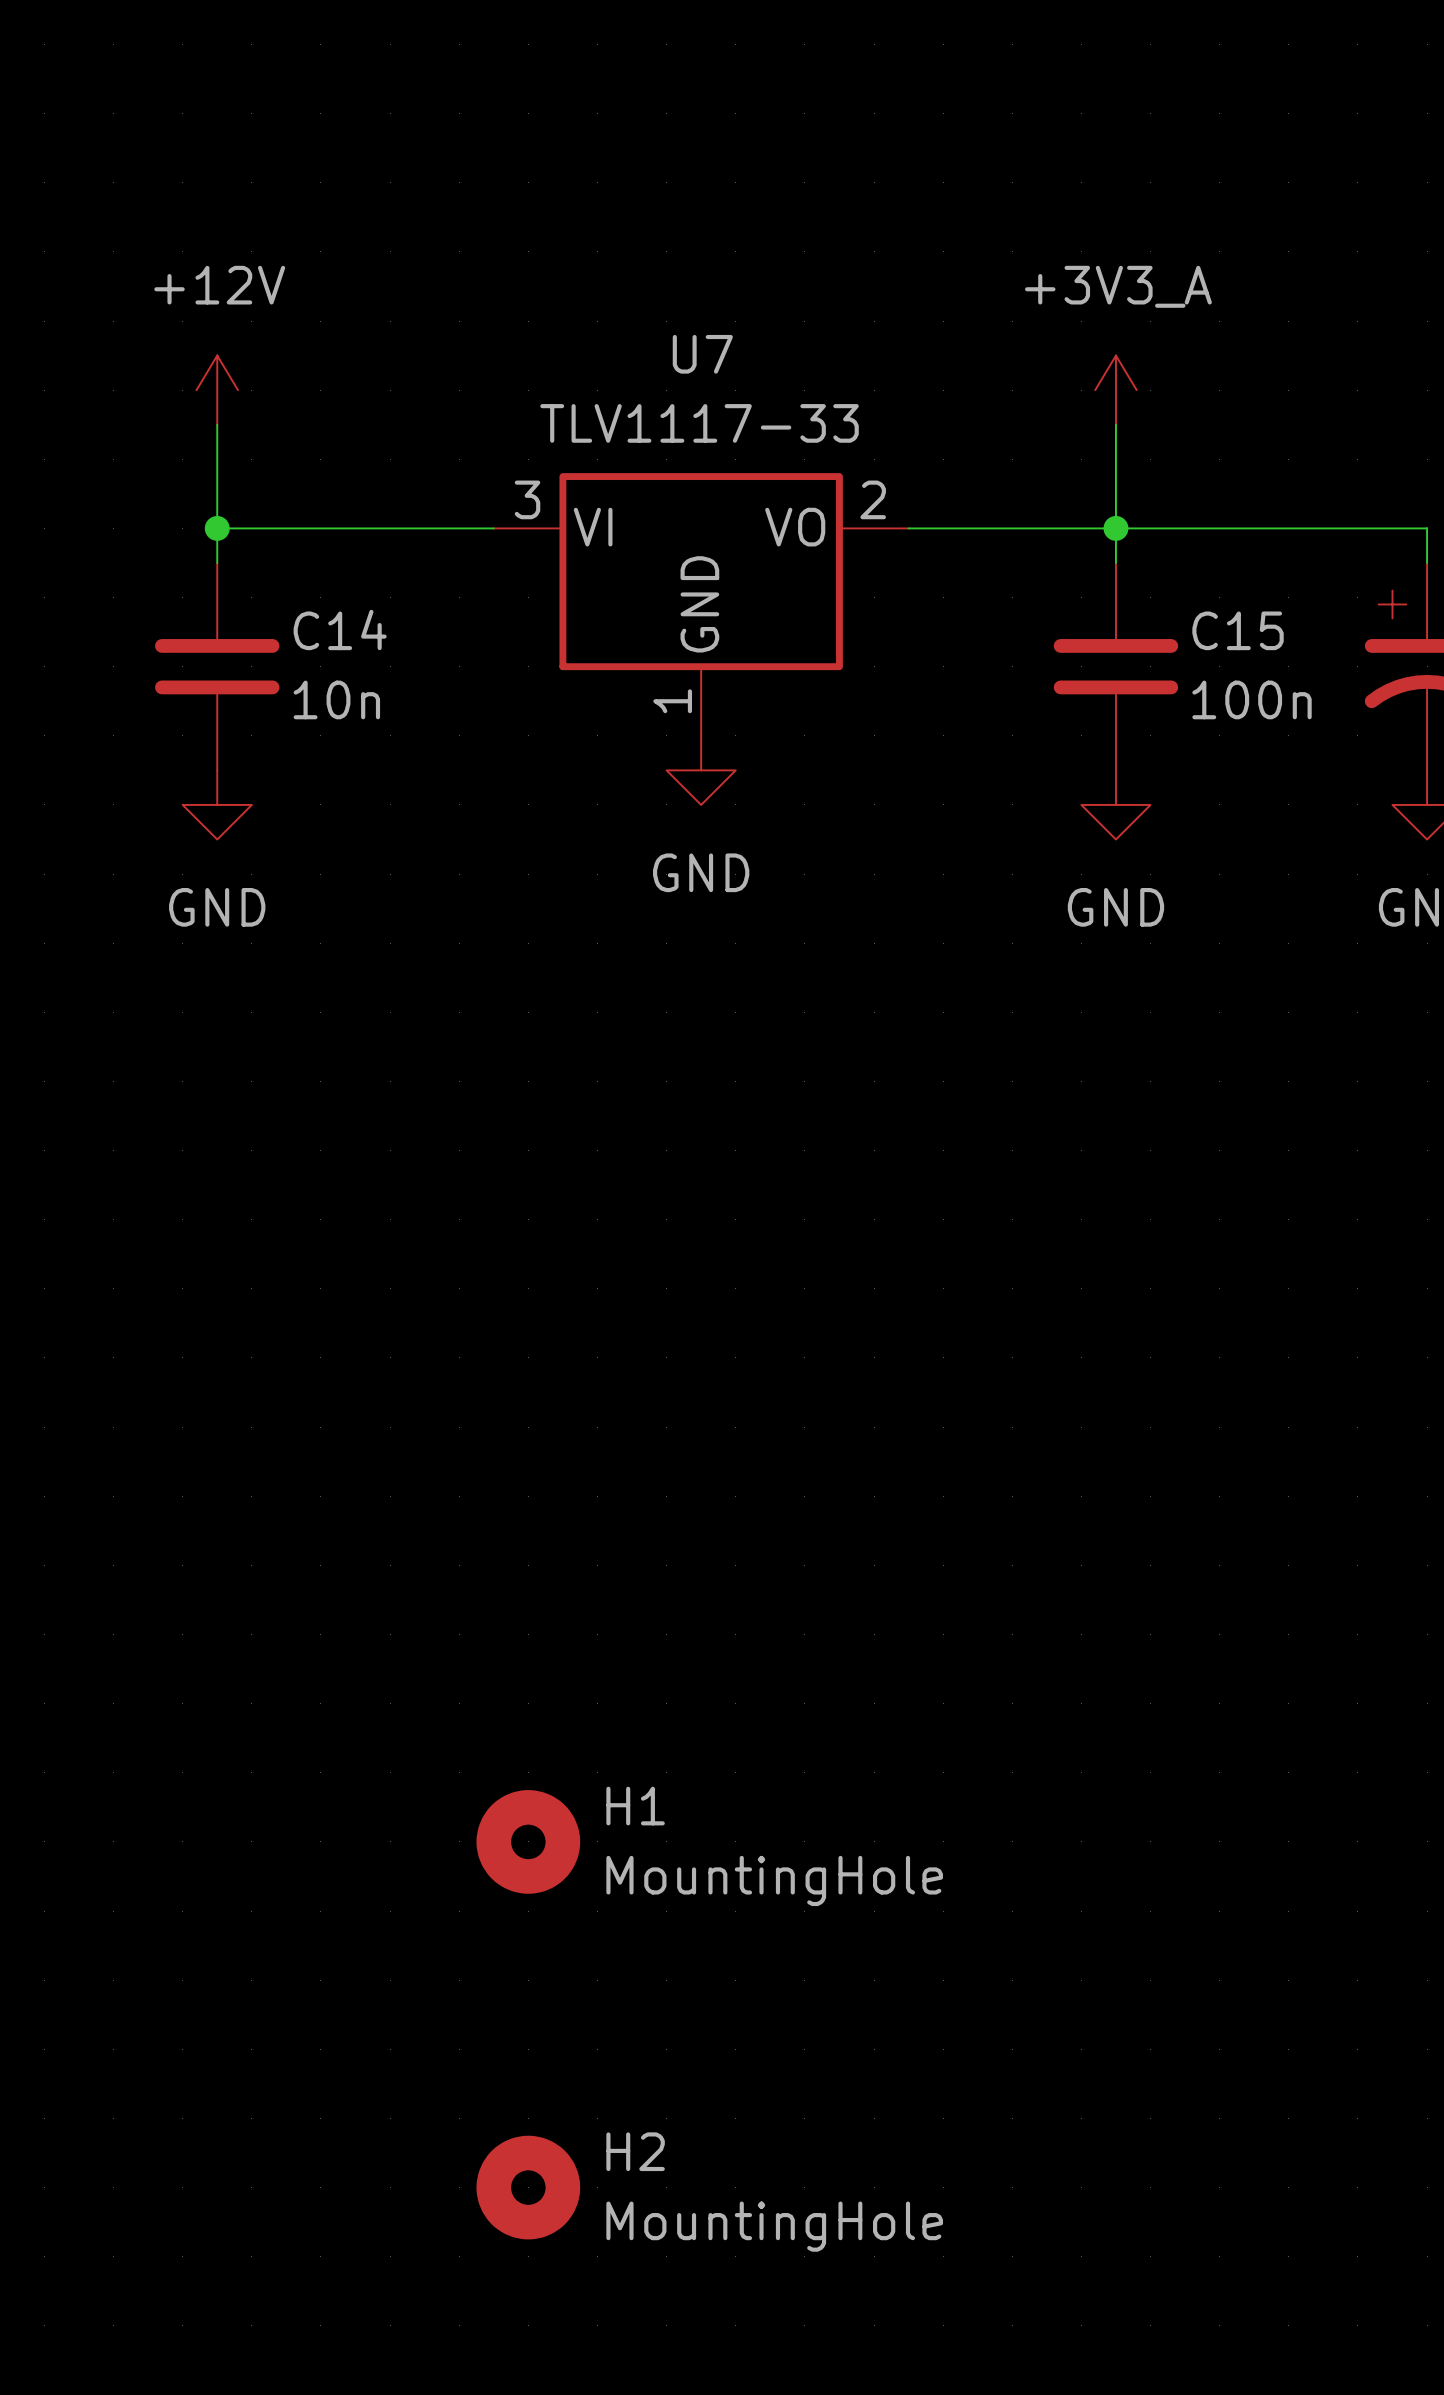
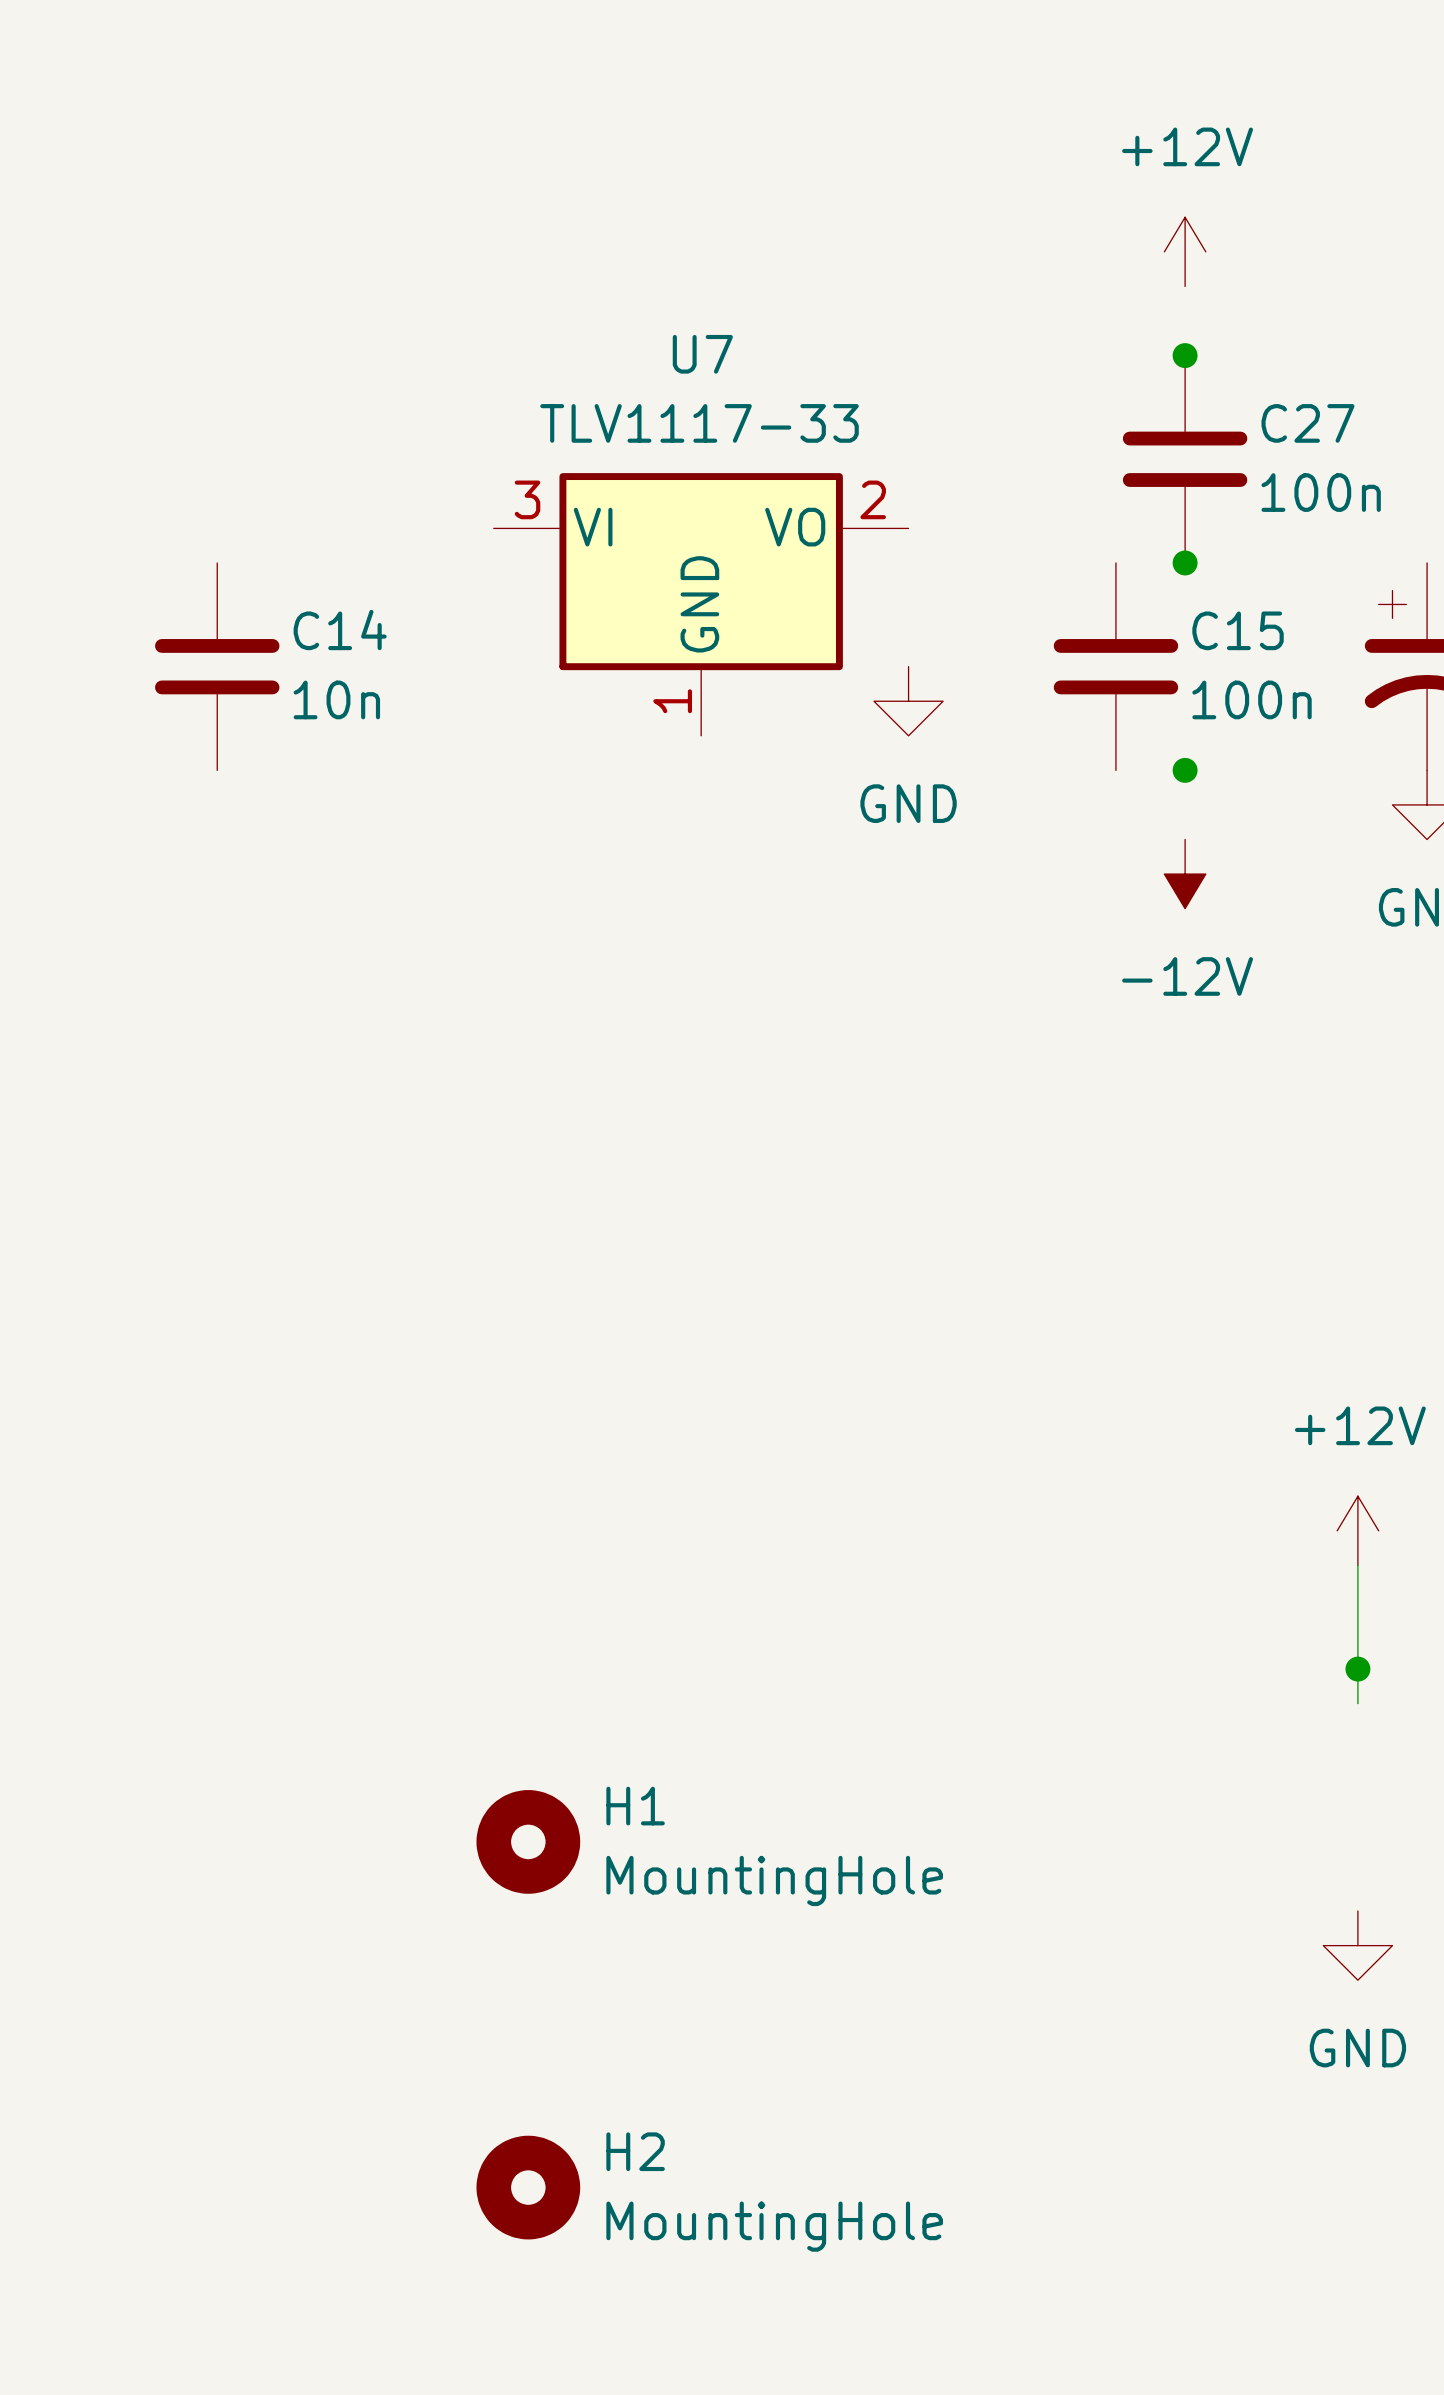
power symbol: none -> +12V (1185, 251)
junction: none -> (1185, 355)
power symbol: +12V (217, 390) -> none
power symbol: +3V3_A (1115, 390) -> none
wire: (217, 424) (217, 562) -> none
wire: (1115, 424) (1115, 562) -> none
C27: none -> 100n (1185, 459)
wire: (217, 528) (493, 528) -> none
junction: (217, 528) -> none
wire: (908, 528) (1427, 528) (1427, 562) -> none
junction position: (1115, 528) -> (1185, 562)
power symbol: none -> GND (908, 701)
power symbol: GND (701, 770) -> none
junction: none -> (1185, 770)
power symbol: GND (217, 804) -> none
power symbol: GND (1115, 804) -> none
power symbol: none -> -12V (1185, 874)
power symbol: none -> +12V (1357, 1530)
wire: none -> (1357, 1565) (1357, 1703)
junction: none -> (1357, 1669)
power symbol: none -> GND (1357, 1945)

